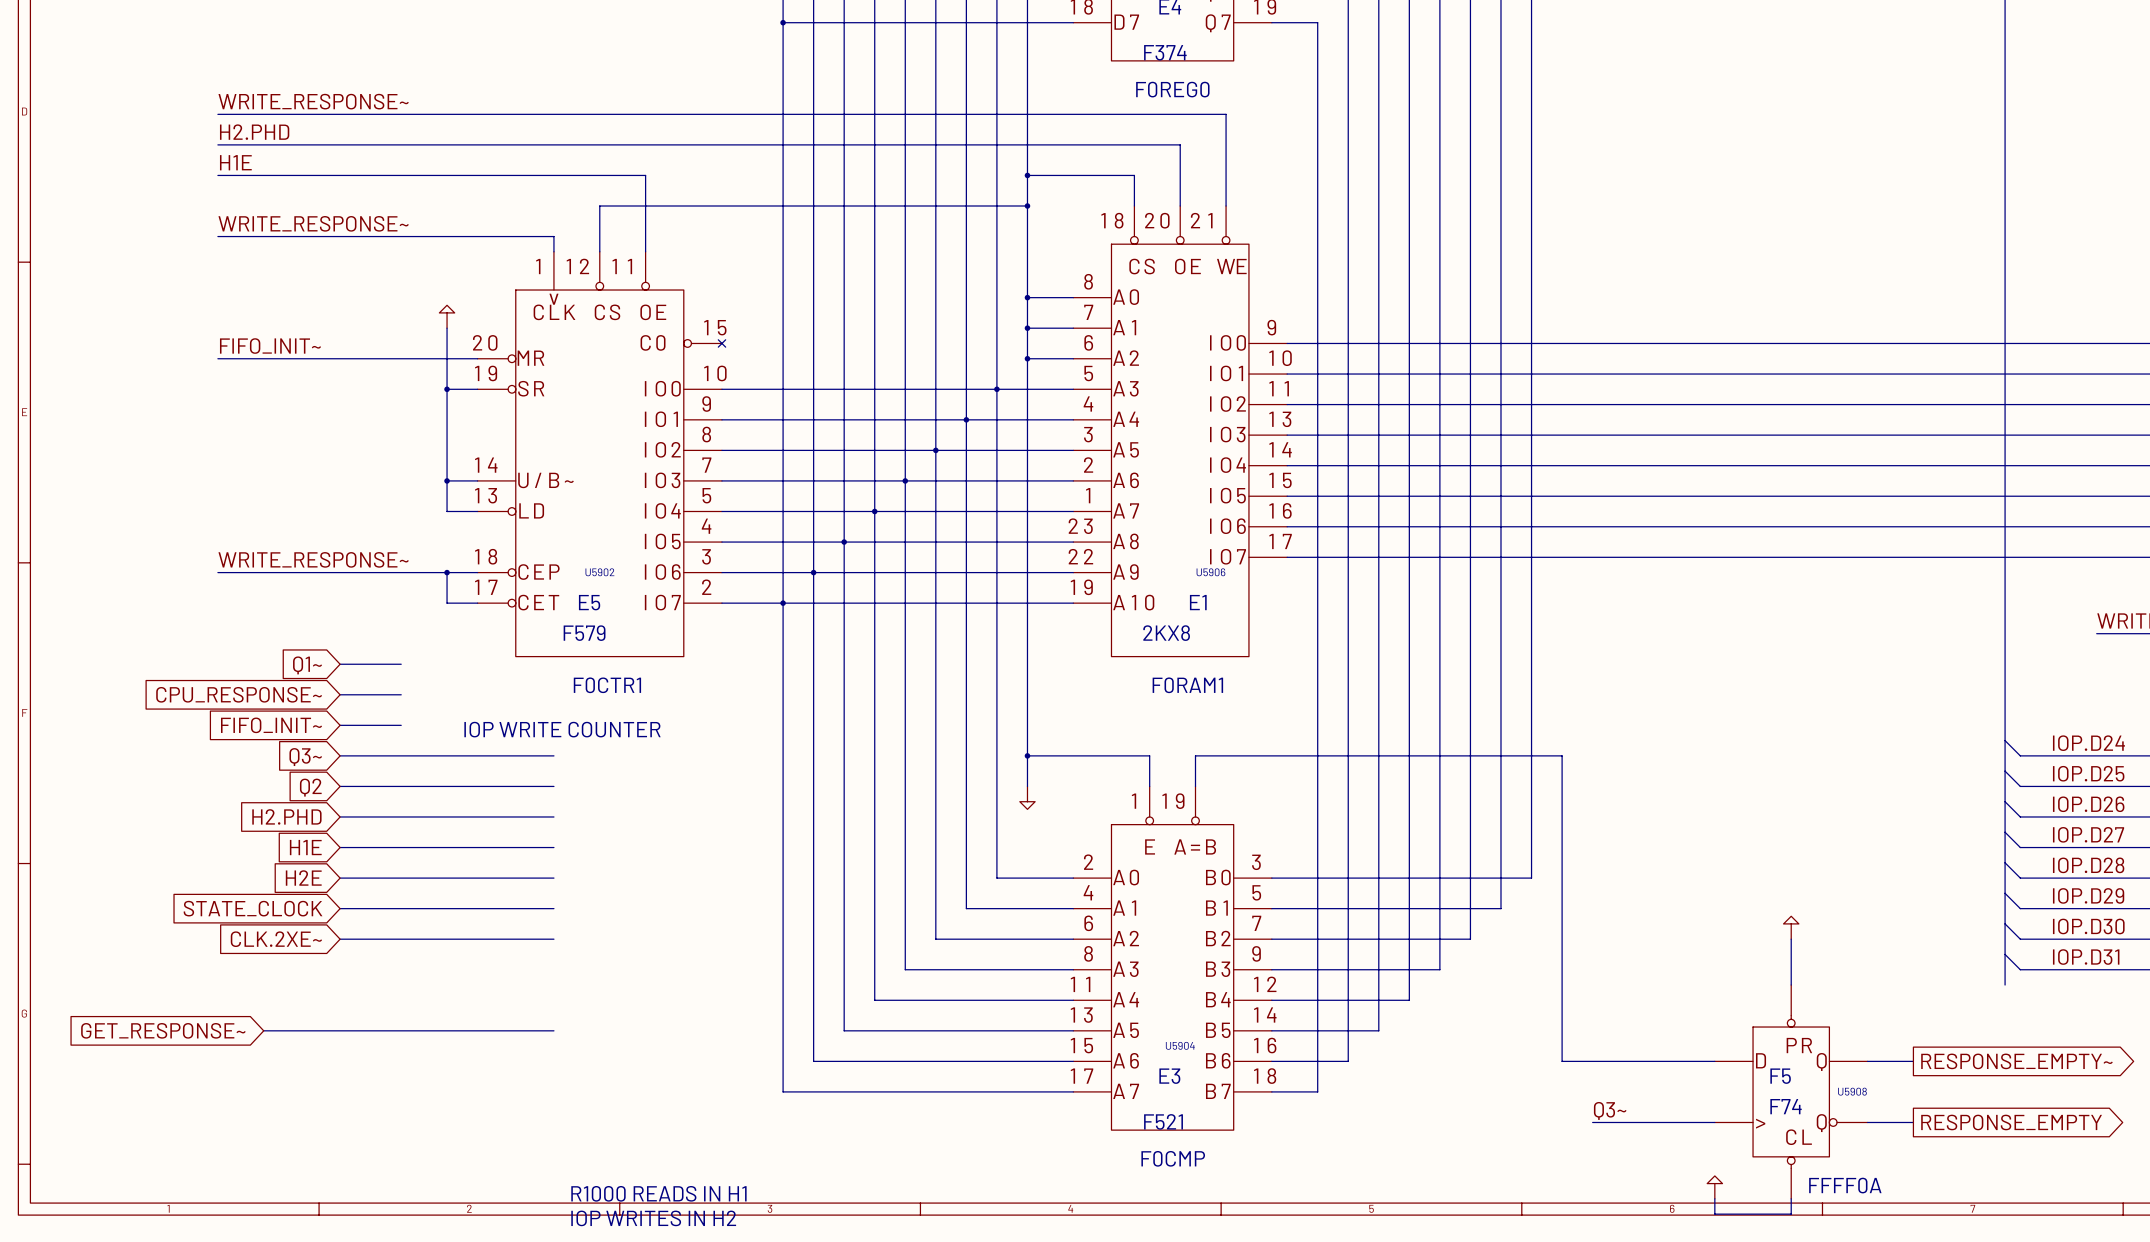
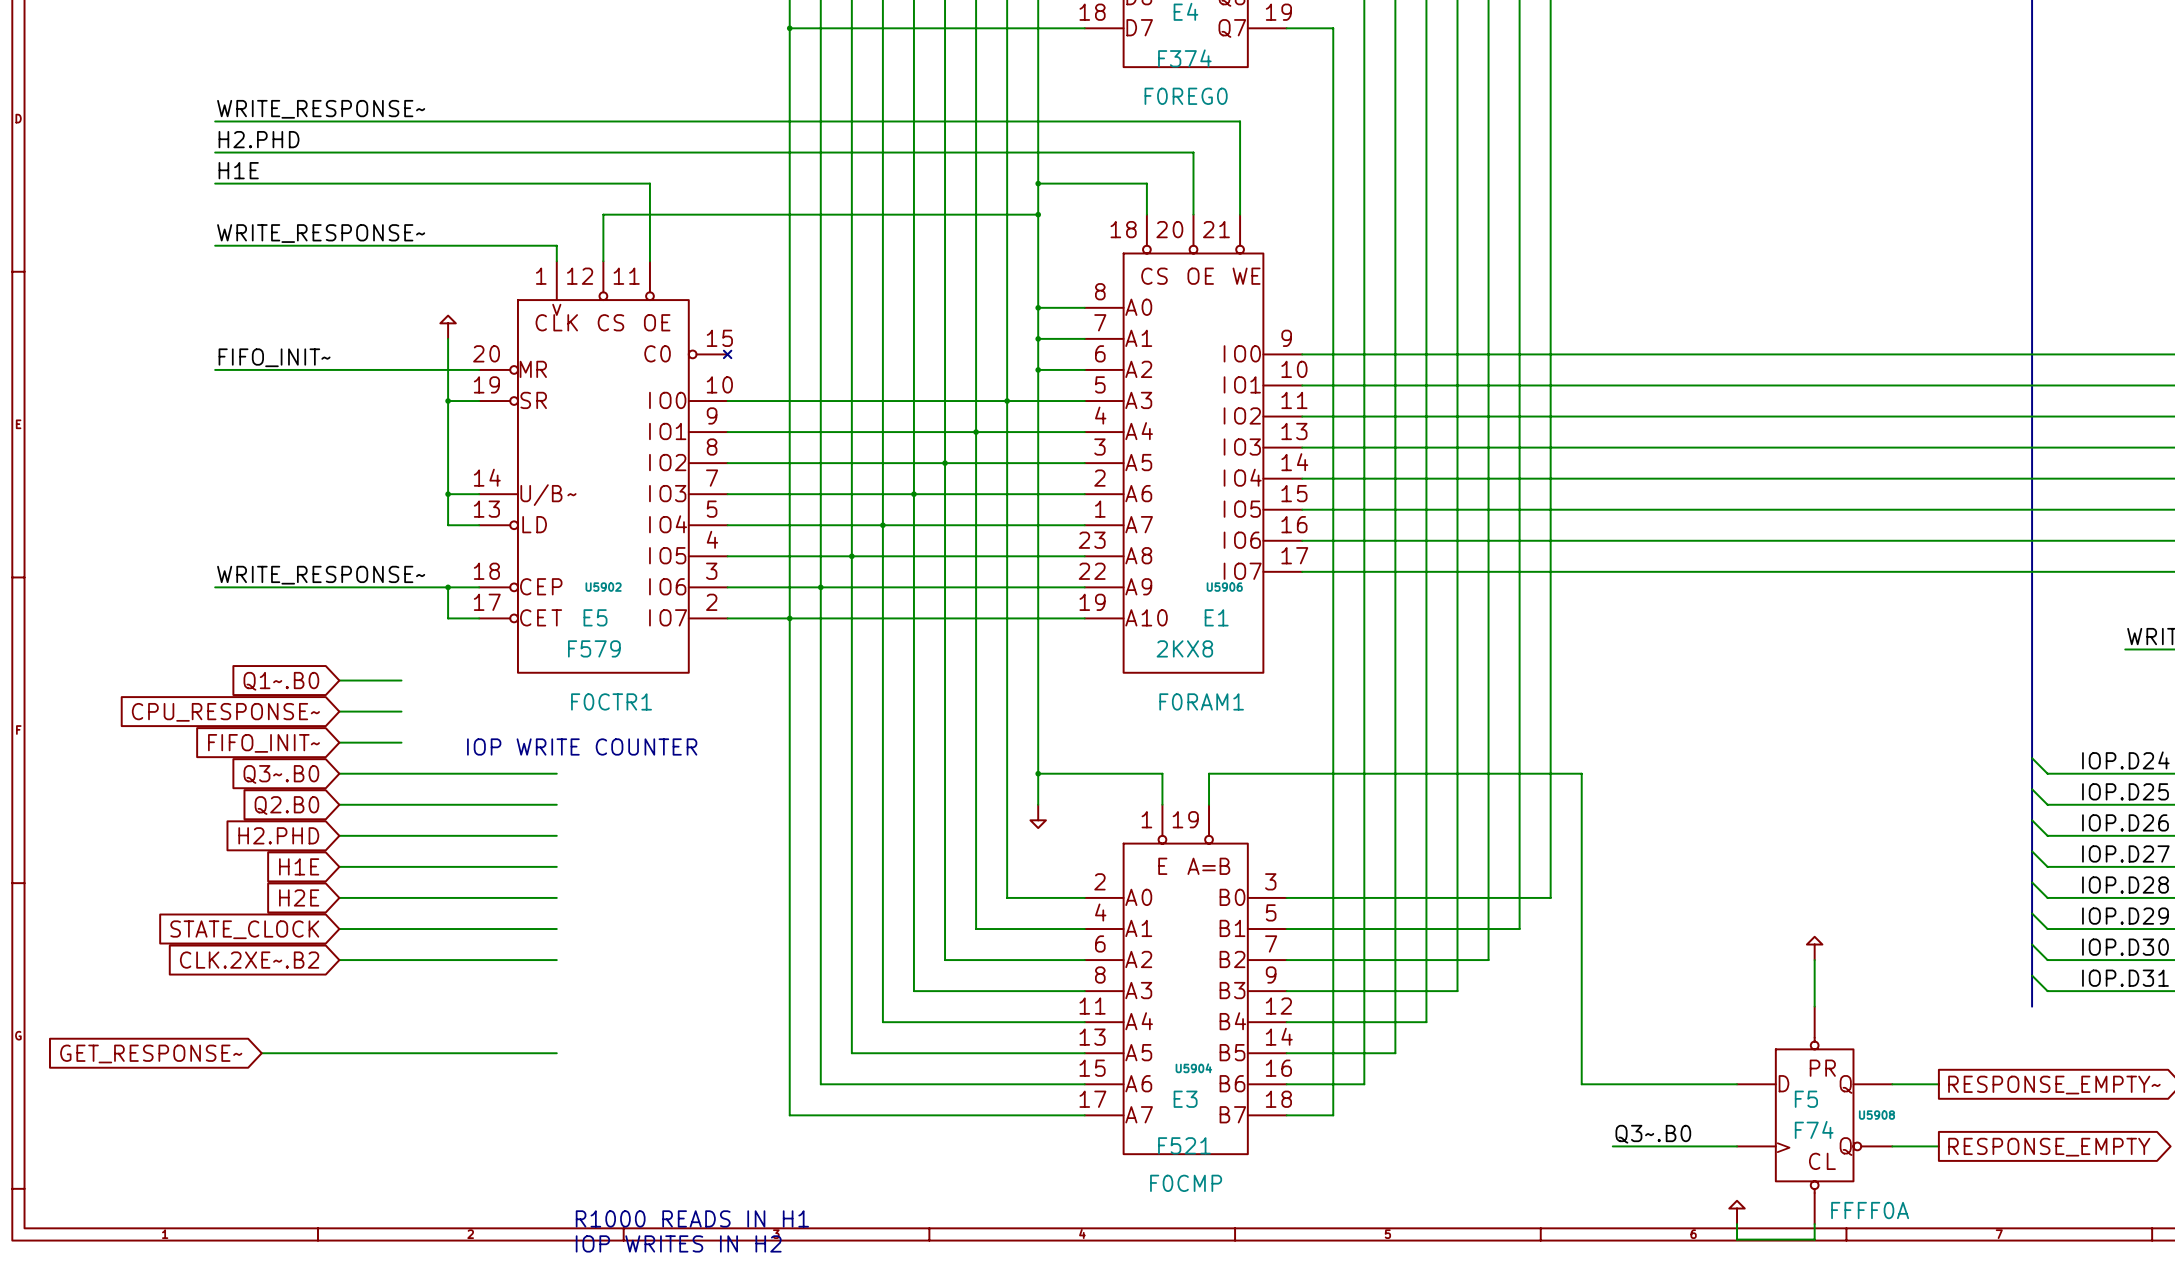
global label: Q1~ (307, 665) -> Q1~.B0 (281, 681)
global label: Q3~ (305, 757) -> Q3~.B0 (281, 774)
global label: Q2 (310, 787) -> Q2.B0 (286, 805)
global label: CLK.2XE~ (276, 939) -> CLK.2XE~.B2 (249, 960)
label: Q3~ (1610, 1110) -> Q3~.B0 (1653, 1134)

